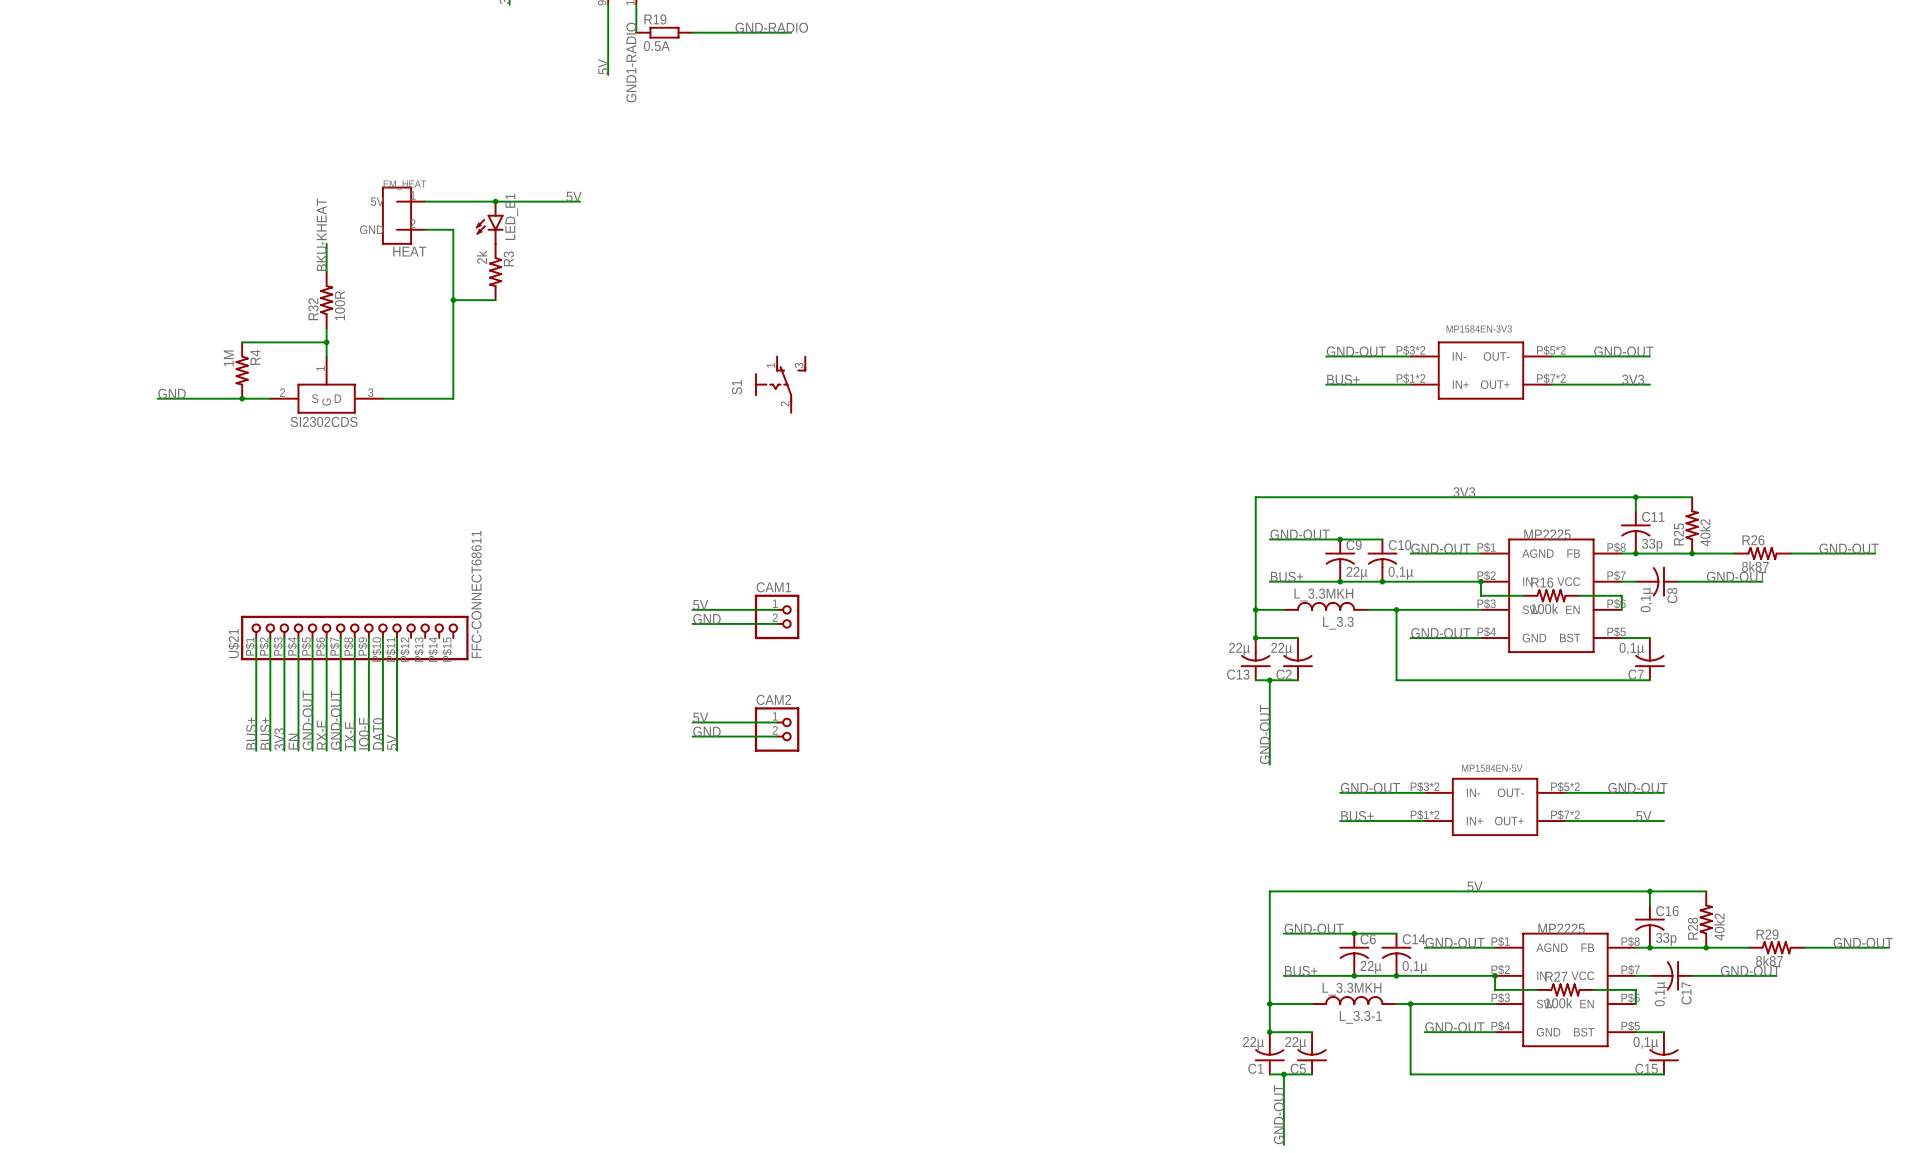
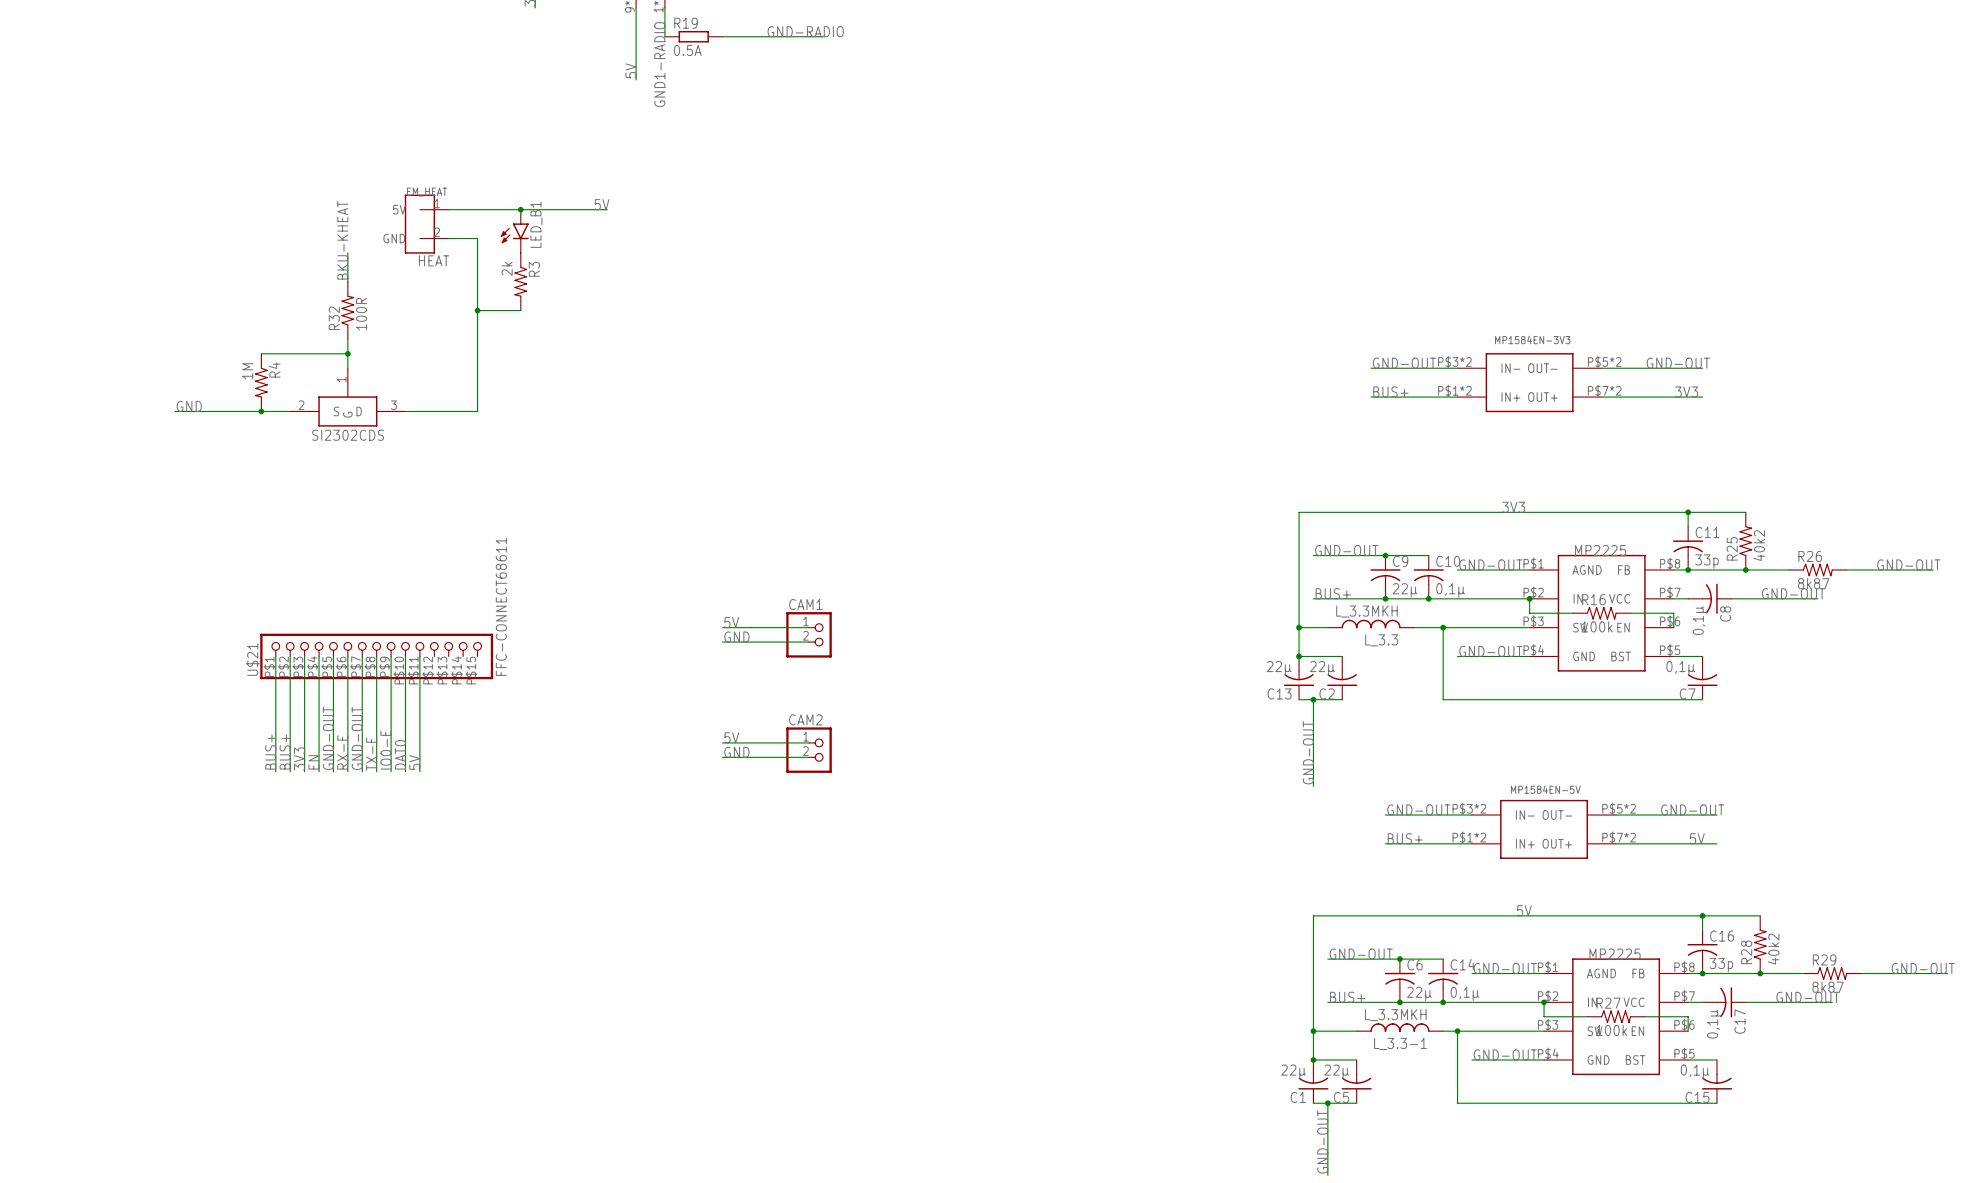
S1: (780, 384) -> none

